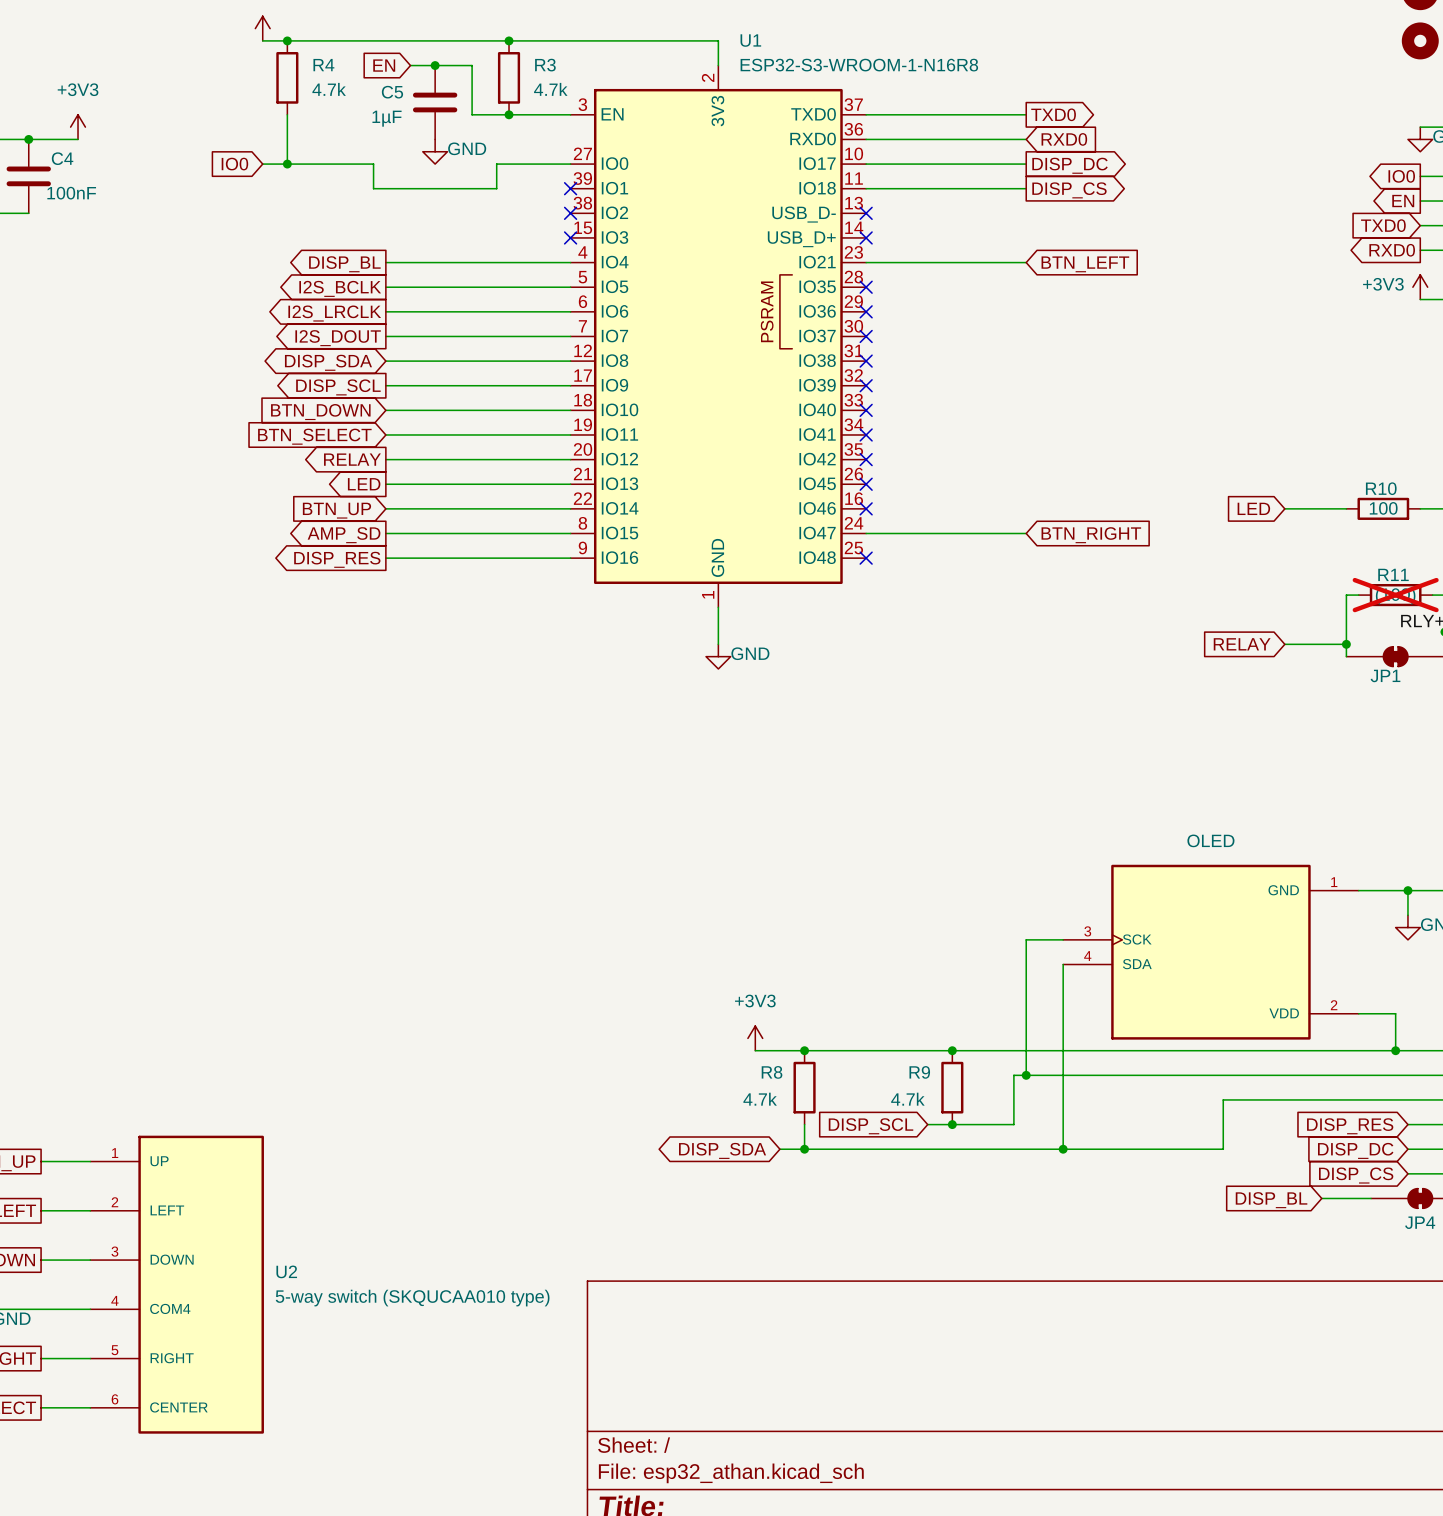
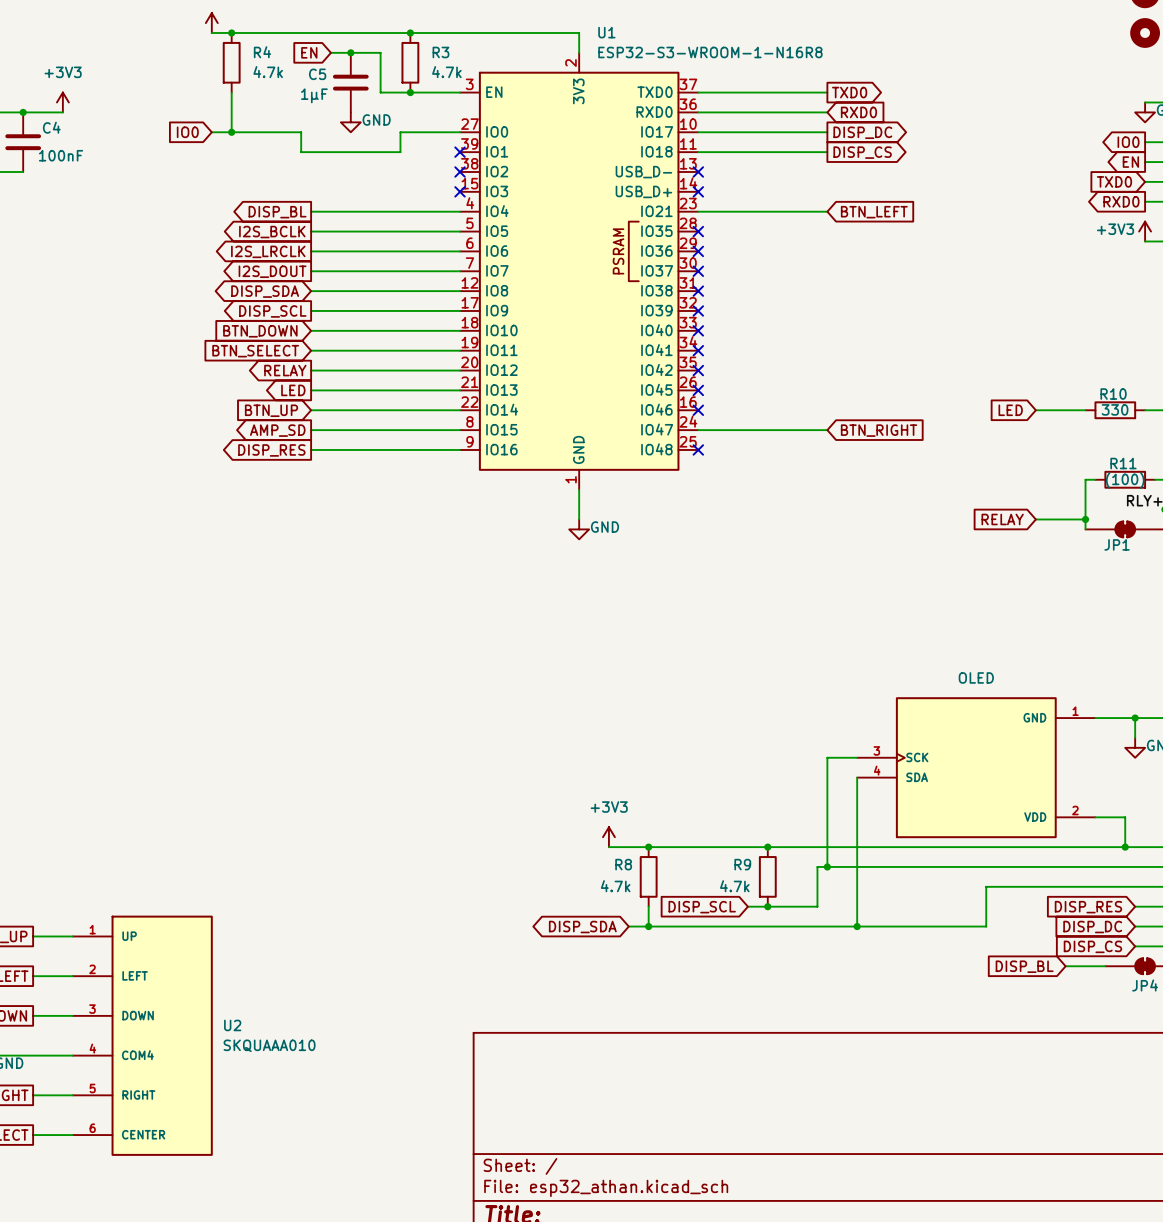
R10 value: 100 (1383, 508) -> 330 (1115, 409)
R11 do-not-place cross: (1395, 595) -> none
U2 value: 5-way switch (SKQUCAA010 type) (412, 1298) -> SKQUAAA010 (269, 1045)

